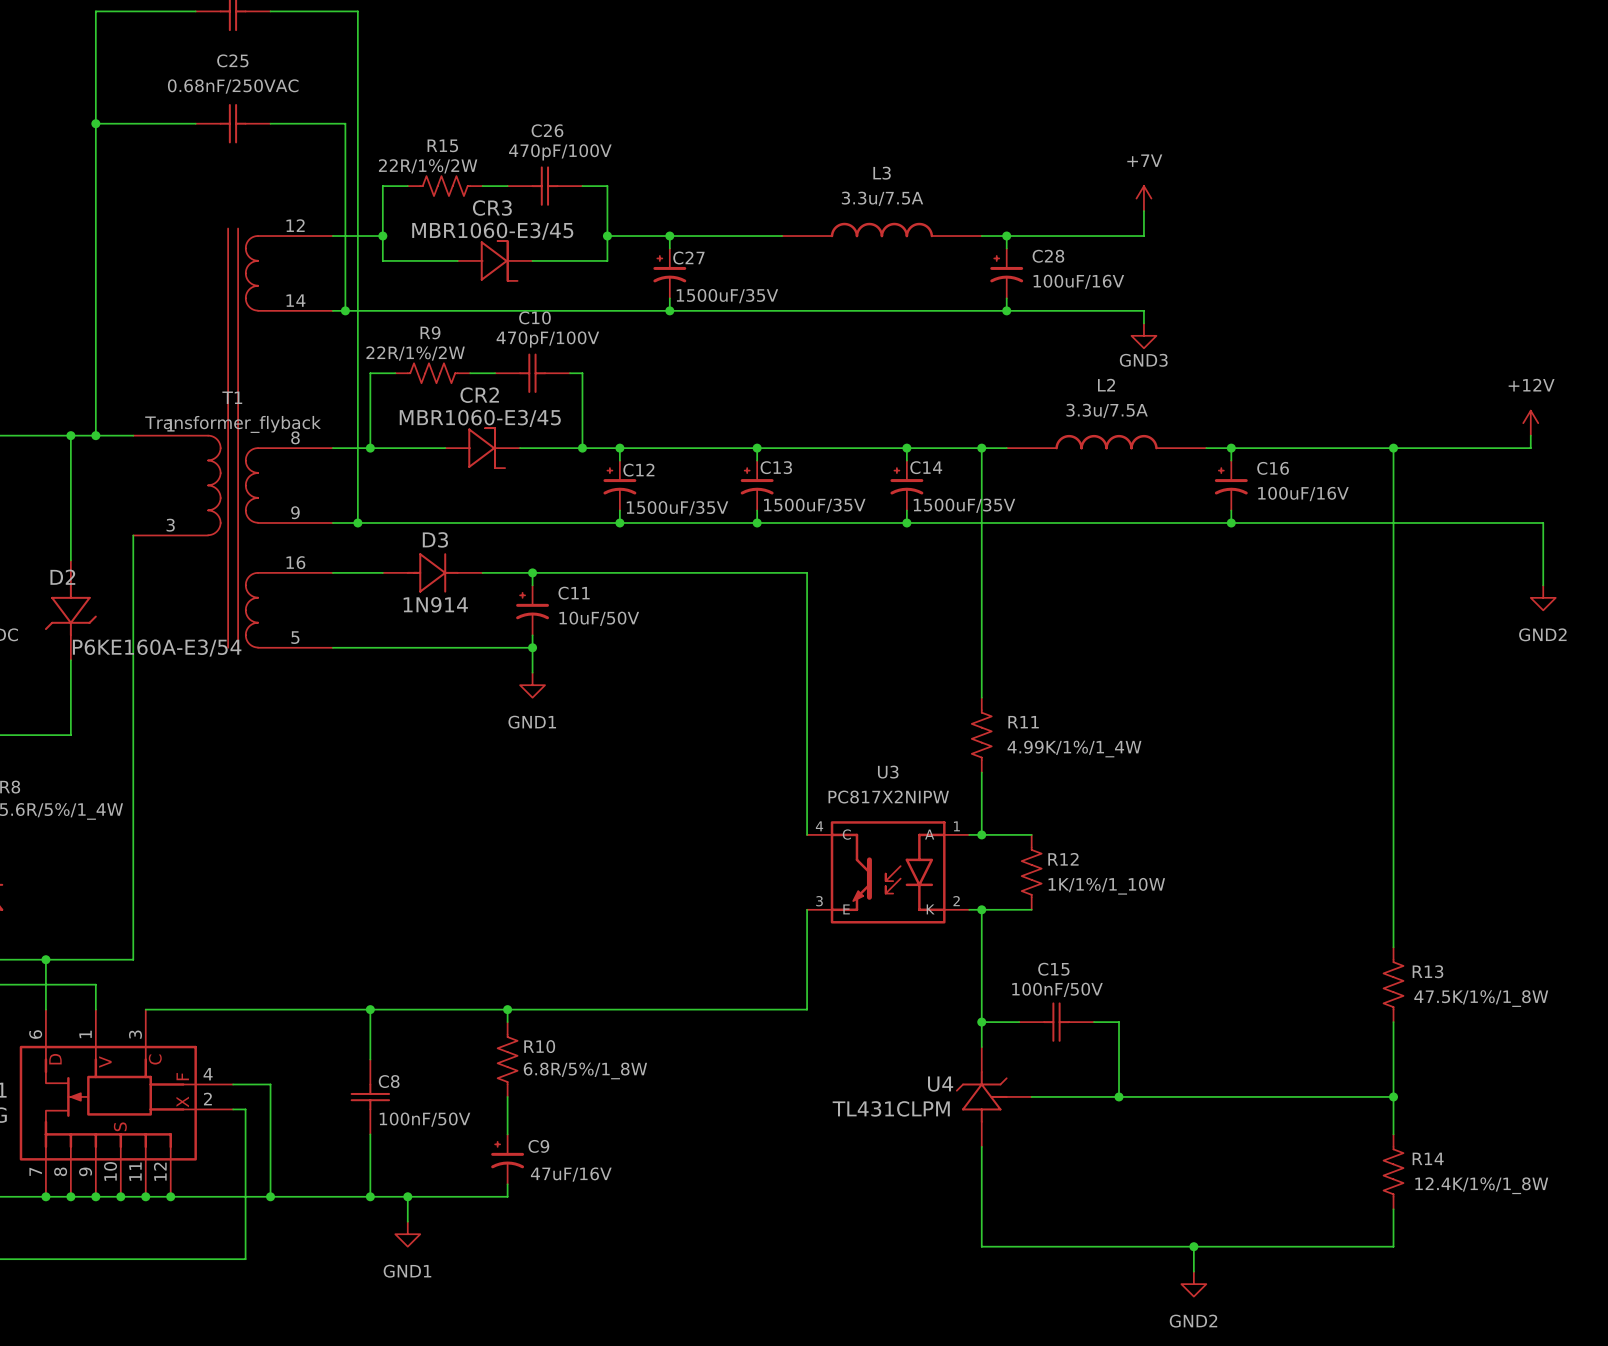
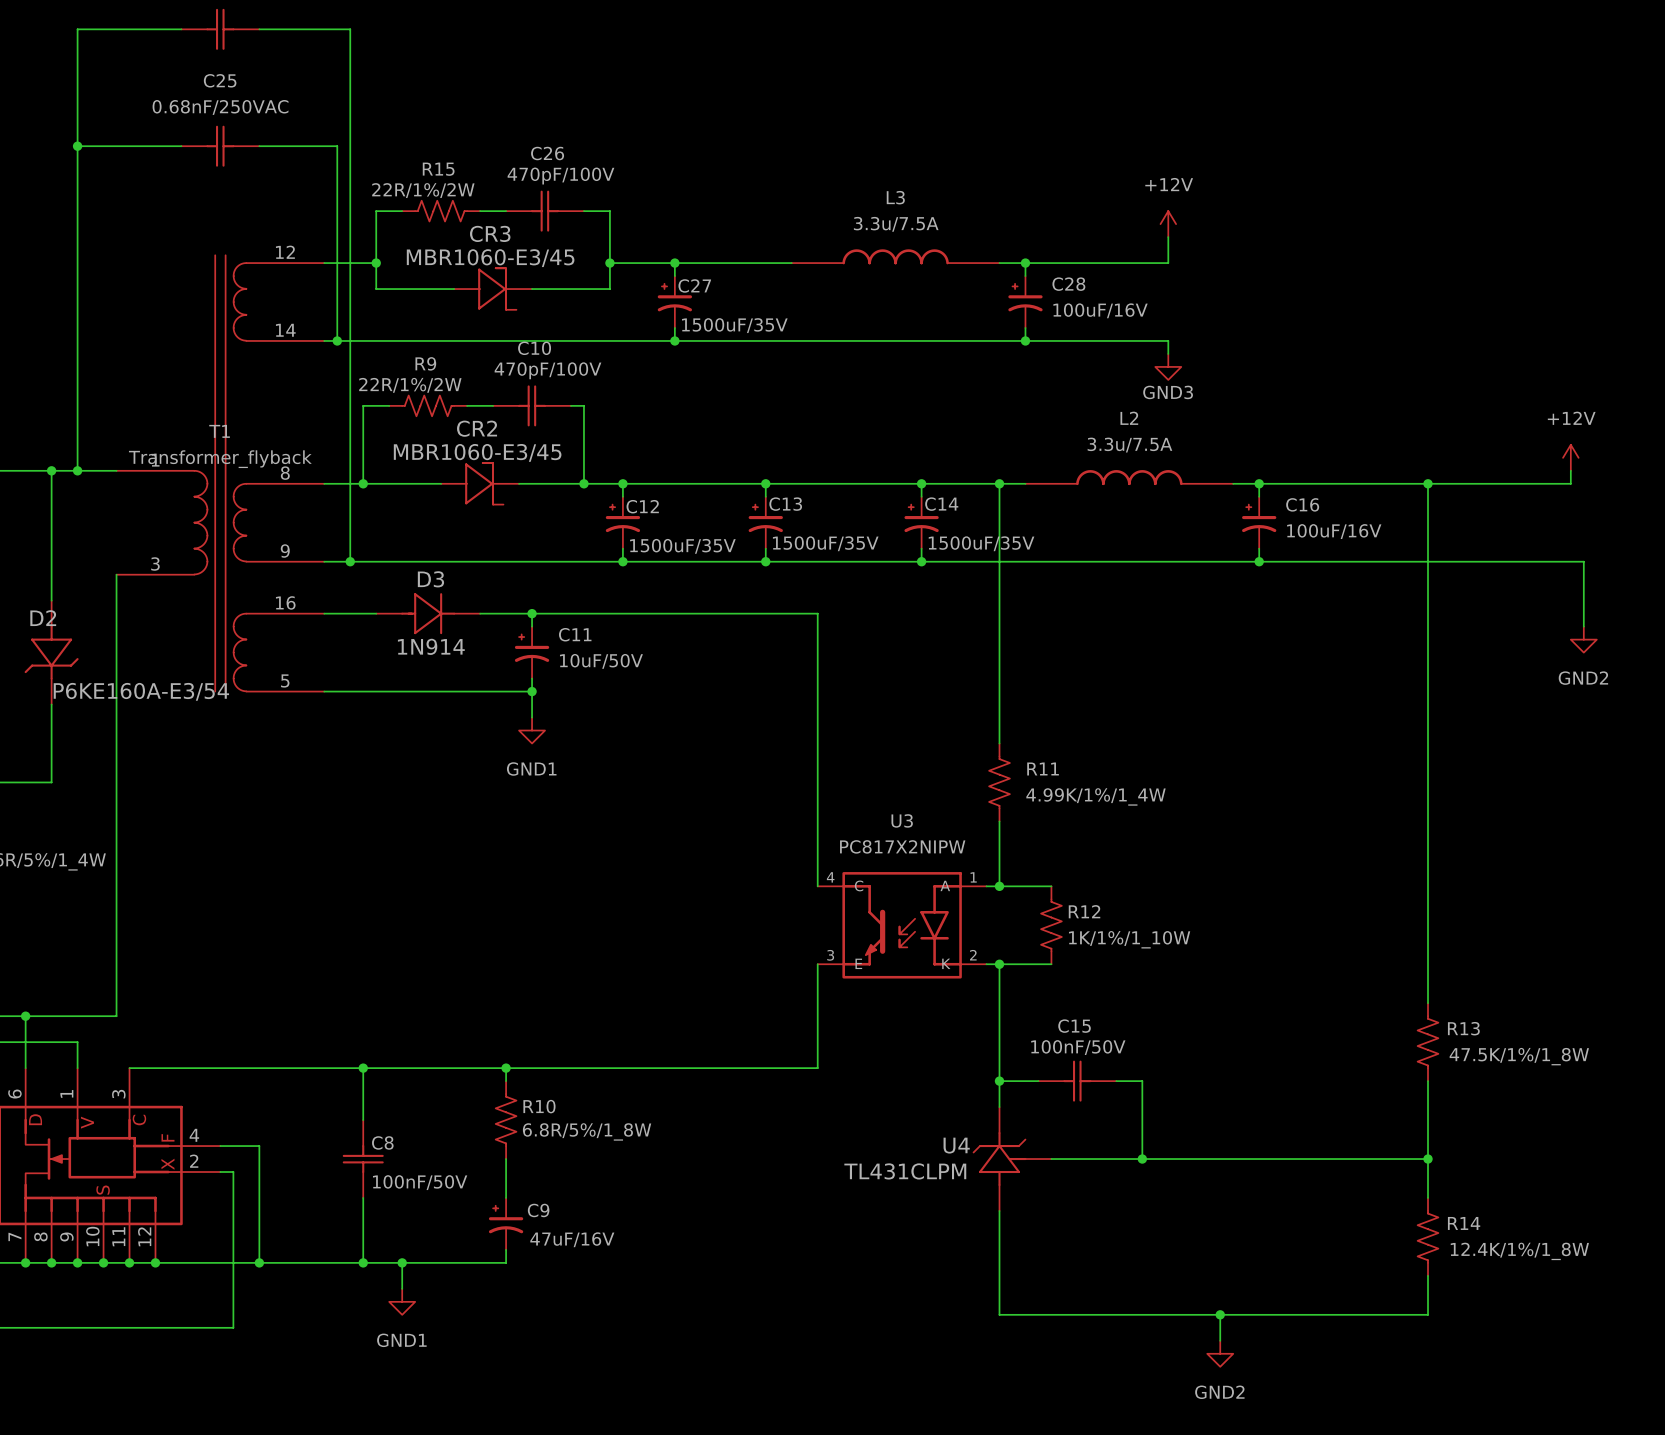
power symbol: +7V (1143, 198) -> +12V (1168, 224)

